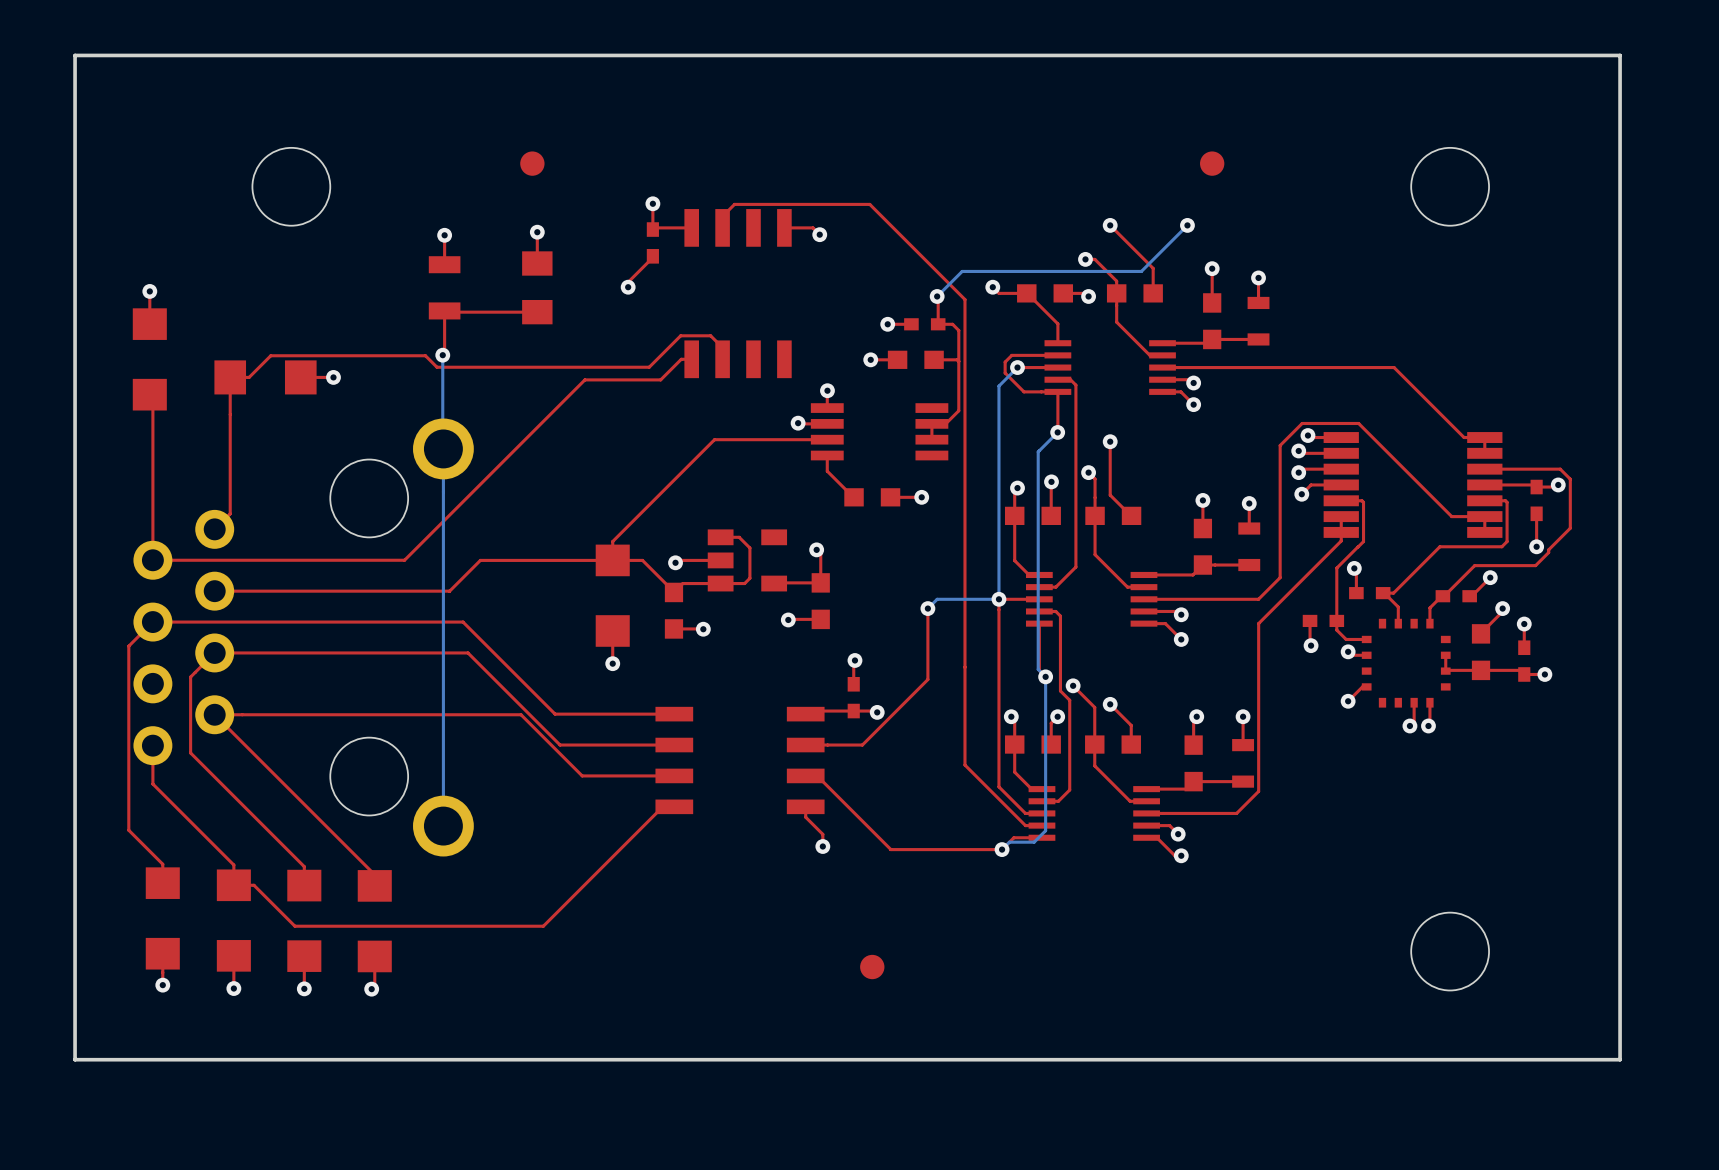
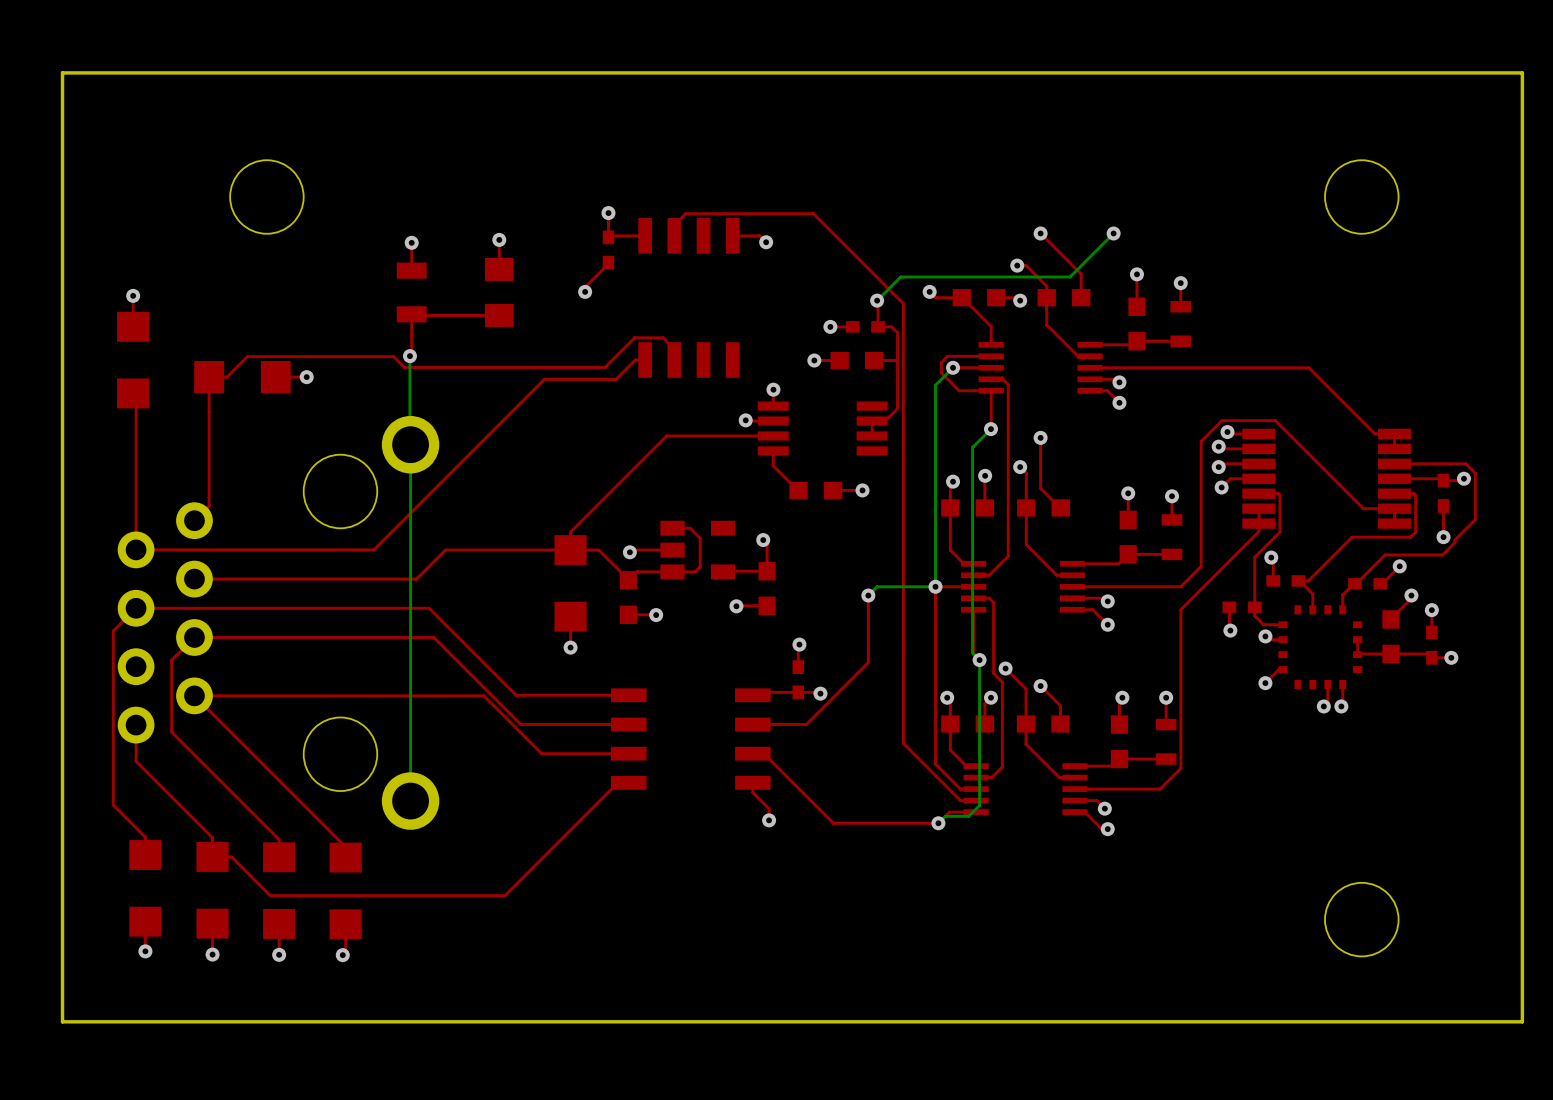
part: (532, 163) -> none
part: (1212, 163) -> none
part: (872, 967) -> none

